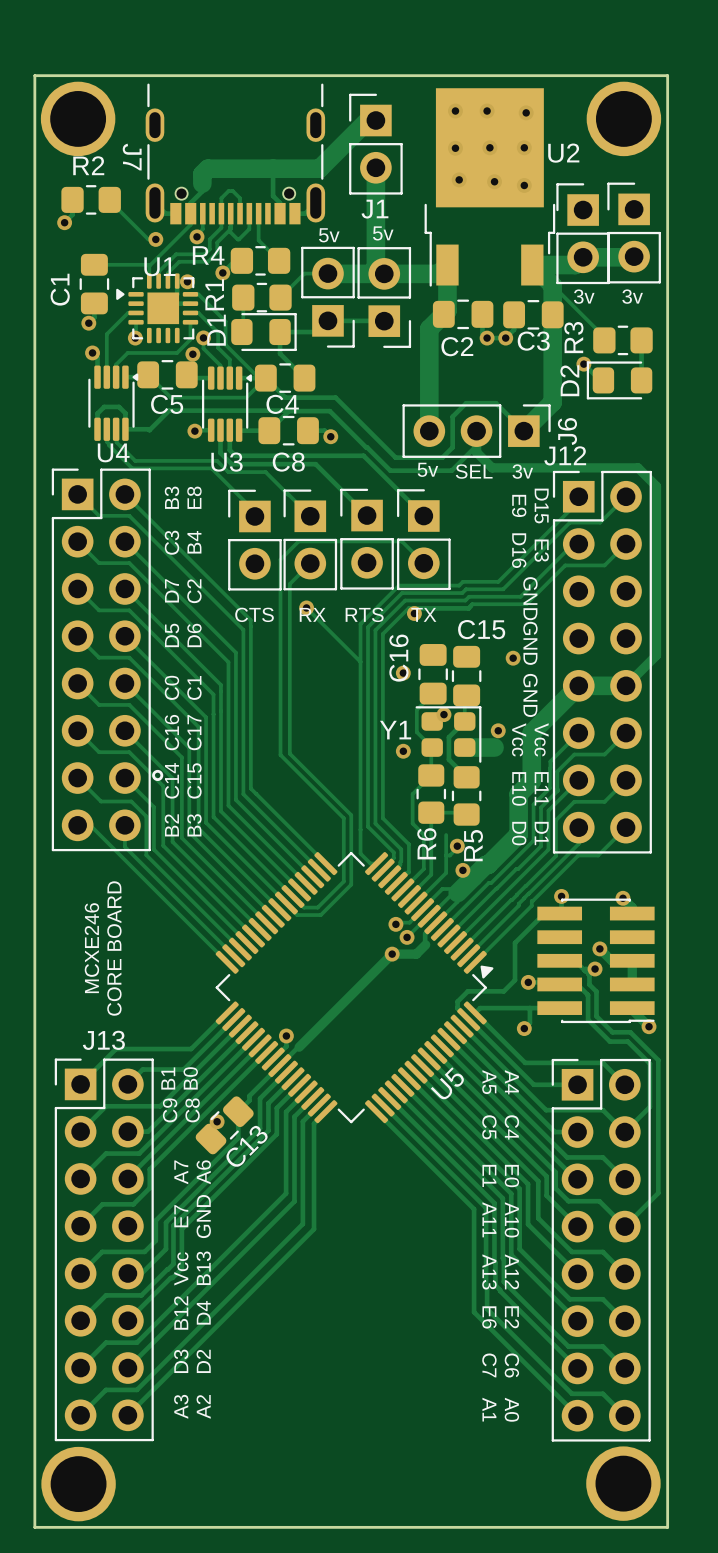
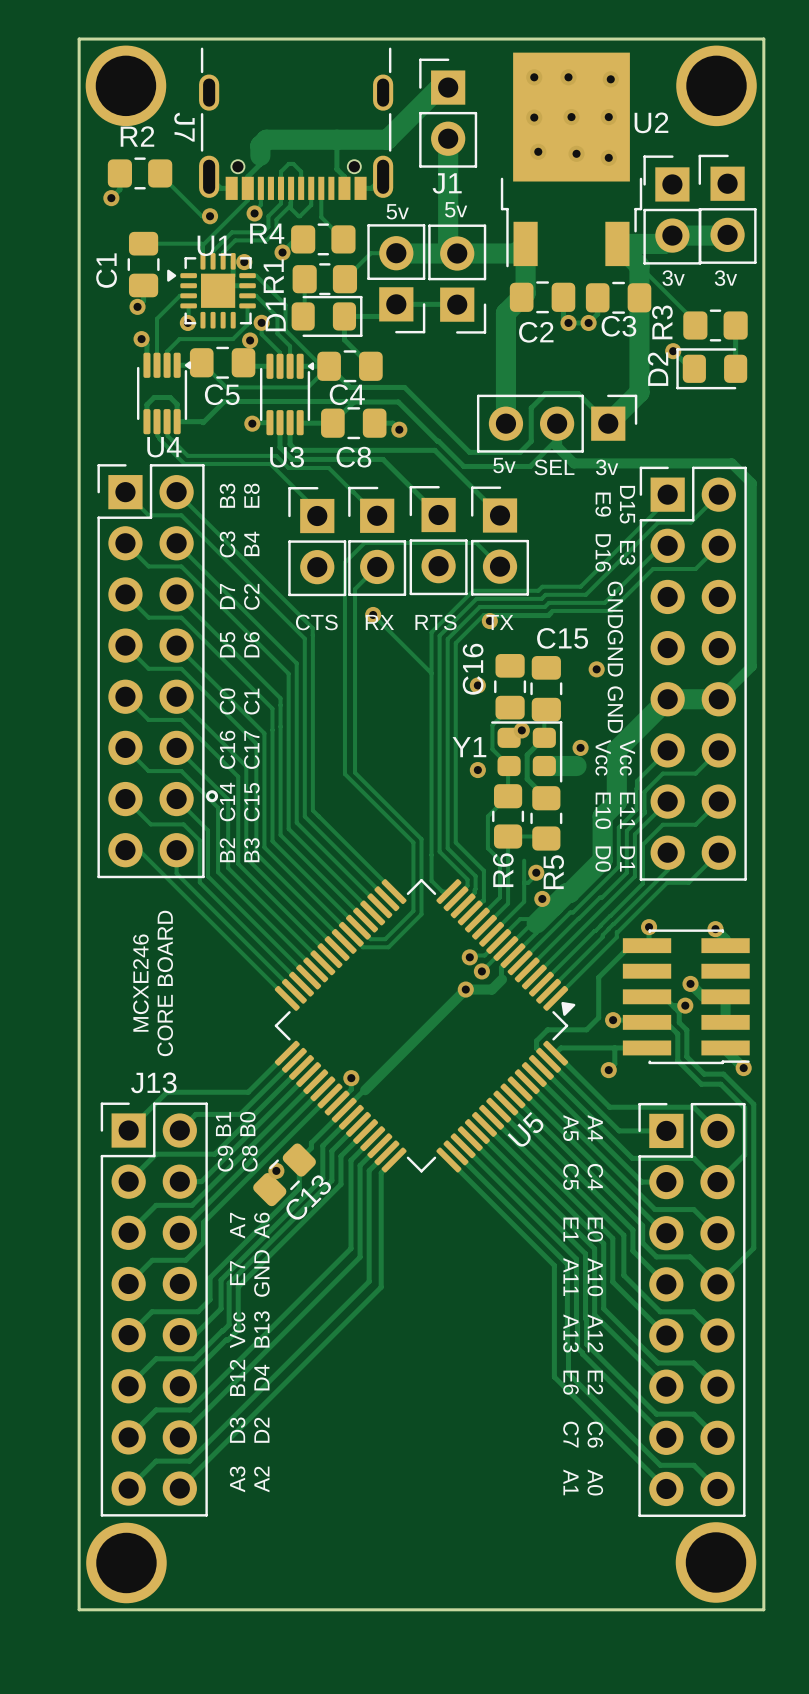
J6 name: J6 (567, 431) -> none
J12 name: J12 (565, 455) -> none

